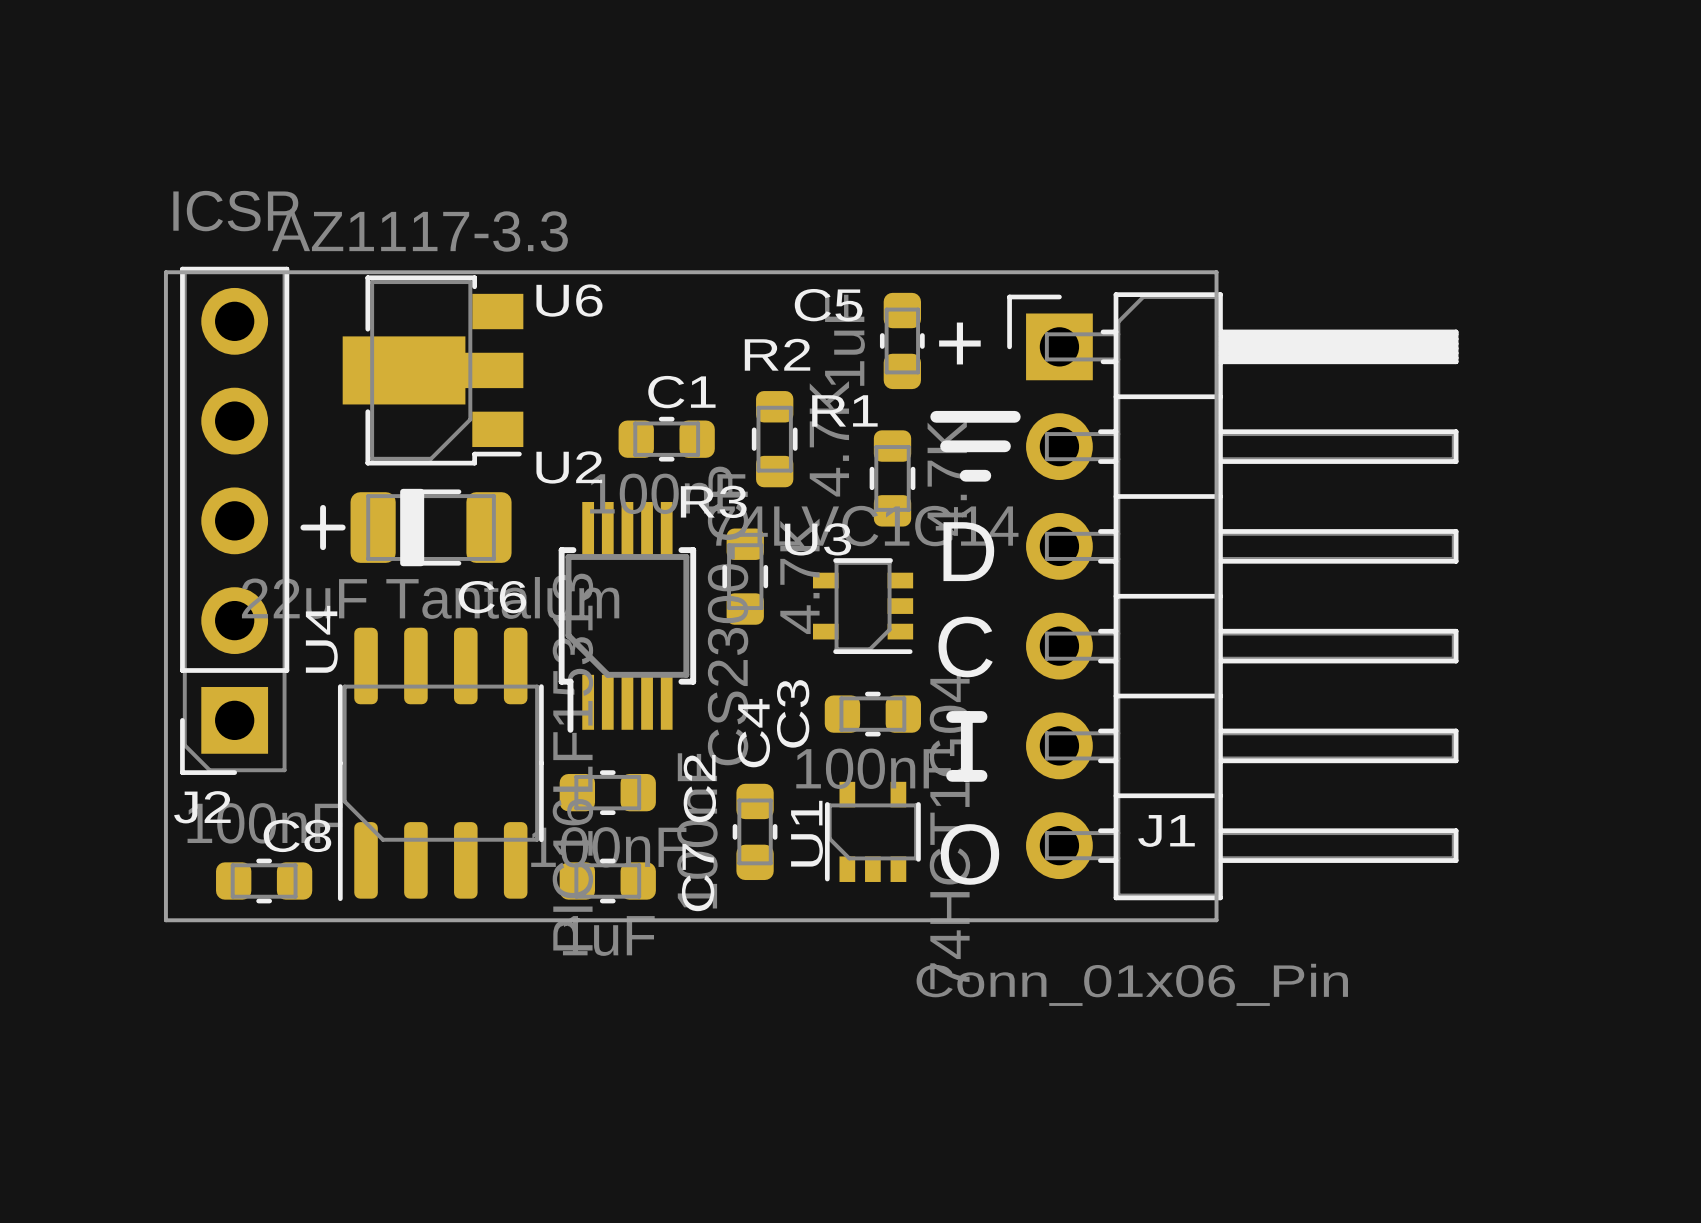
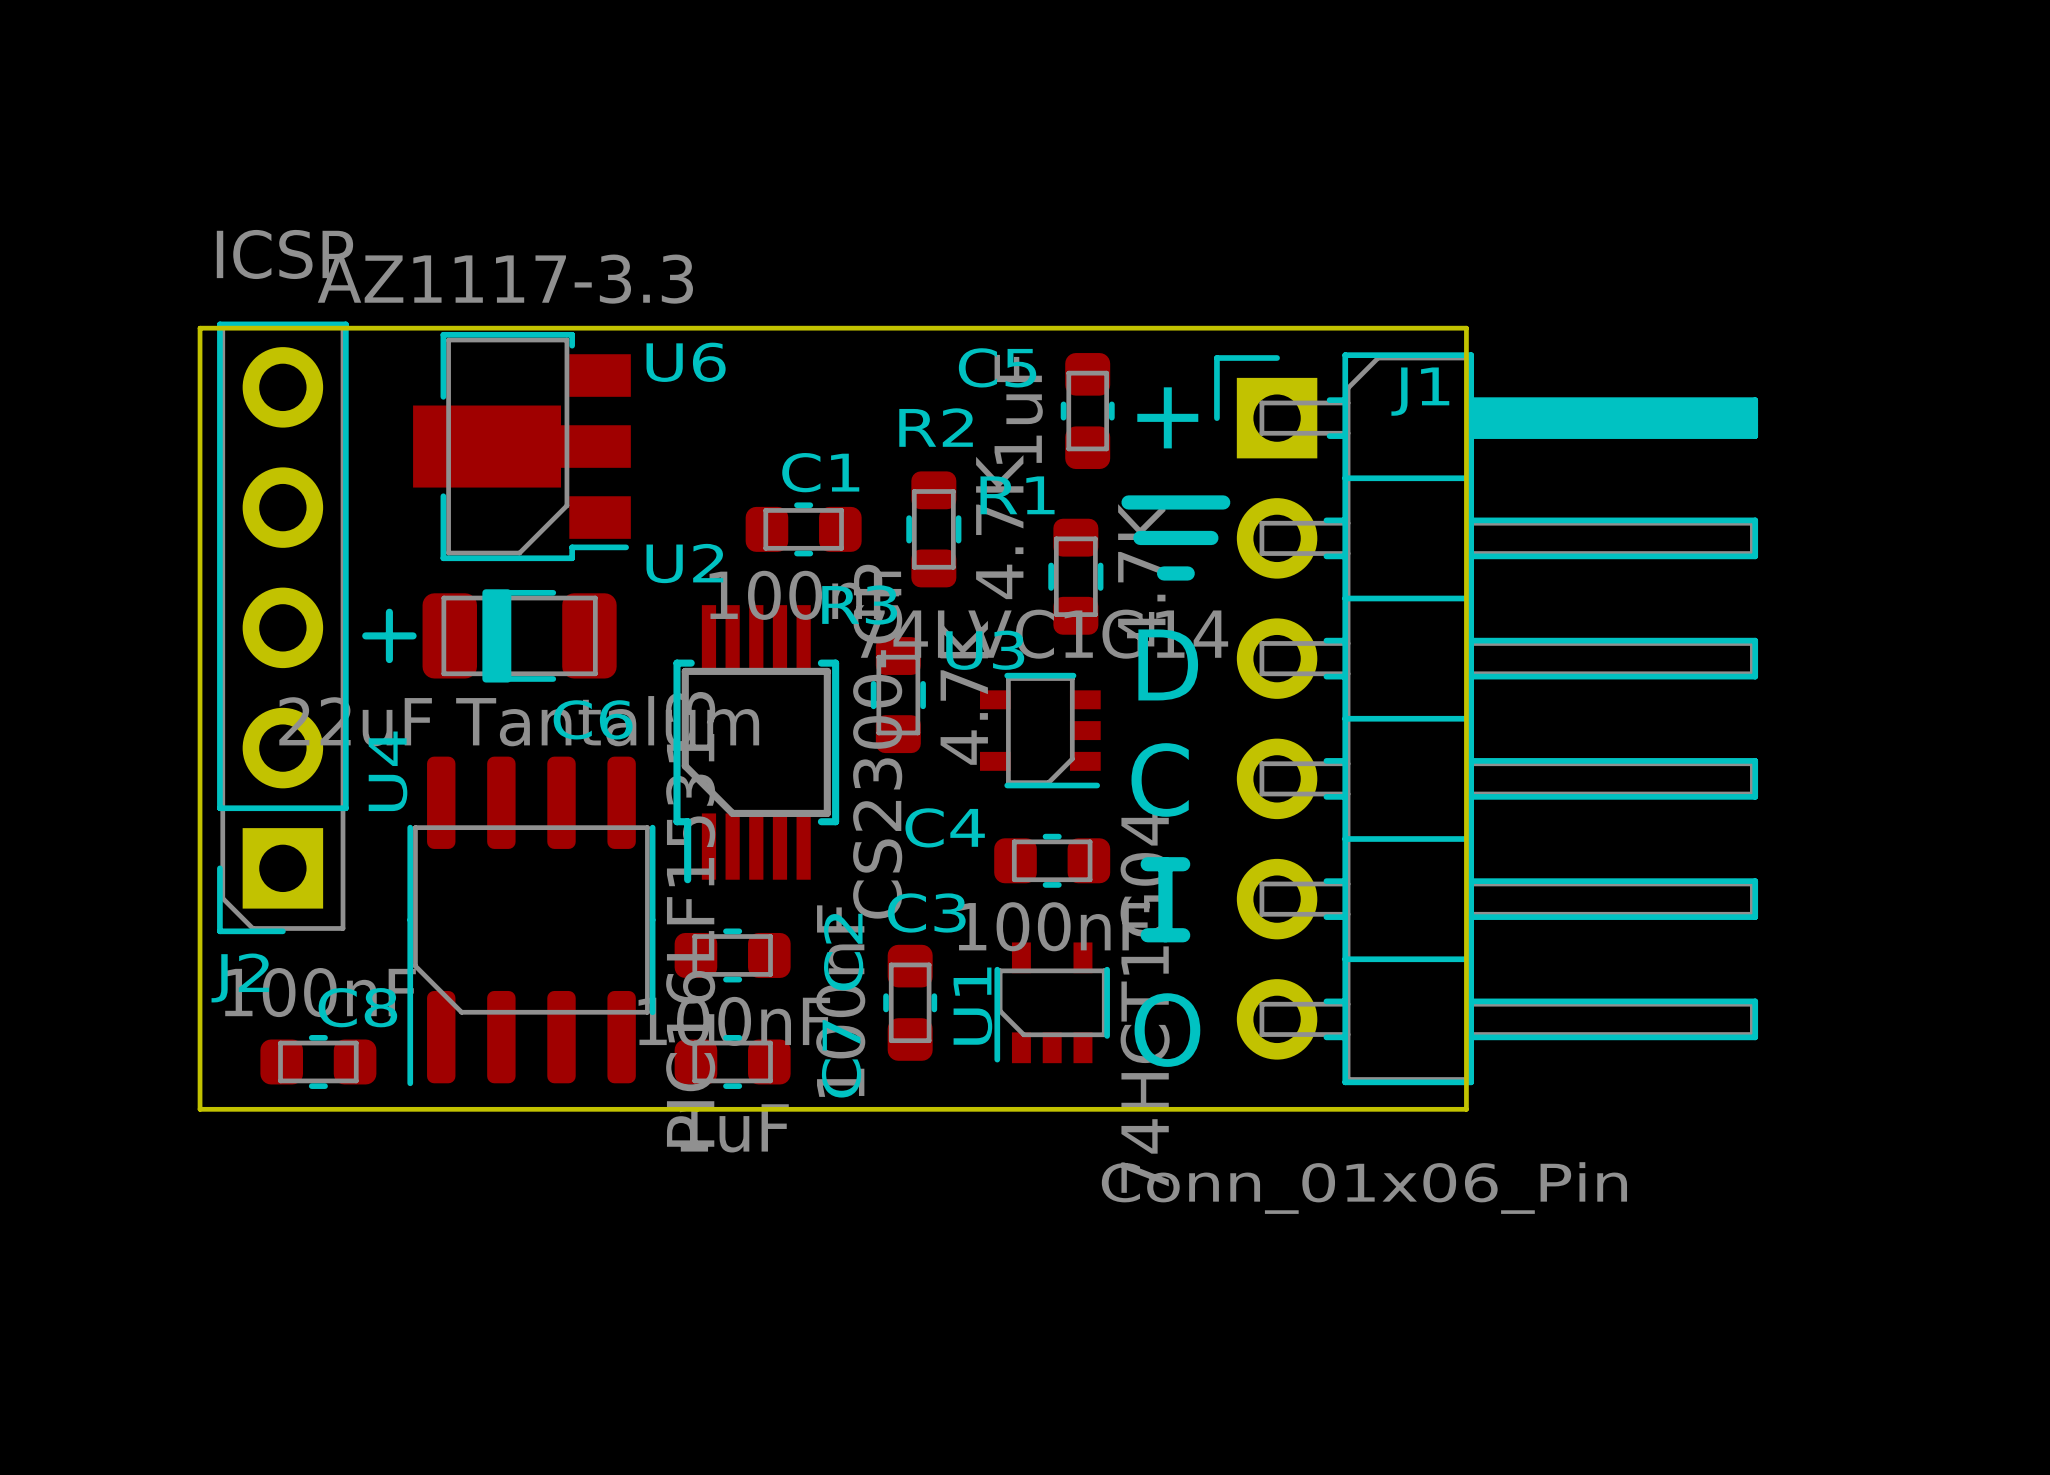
C3 name: C3 (793, 713) -> C4 (945, 827)
C4 name: C4 (753, 733) -> C3 (926, 912)
J1 name position: J1 (1166, 830) -> J1 (1420, 391)

